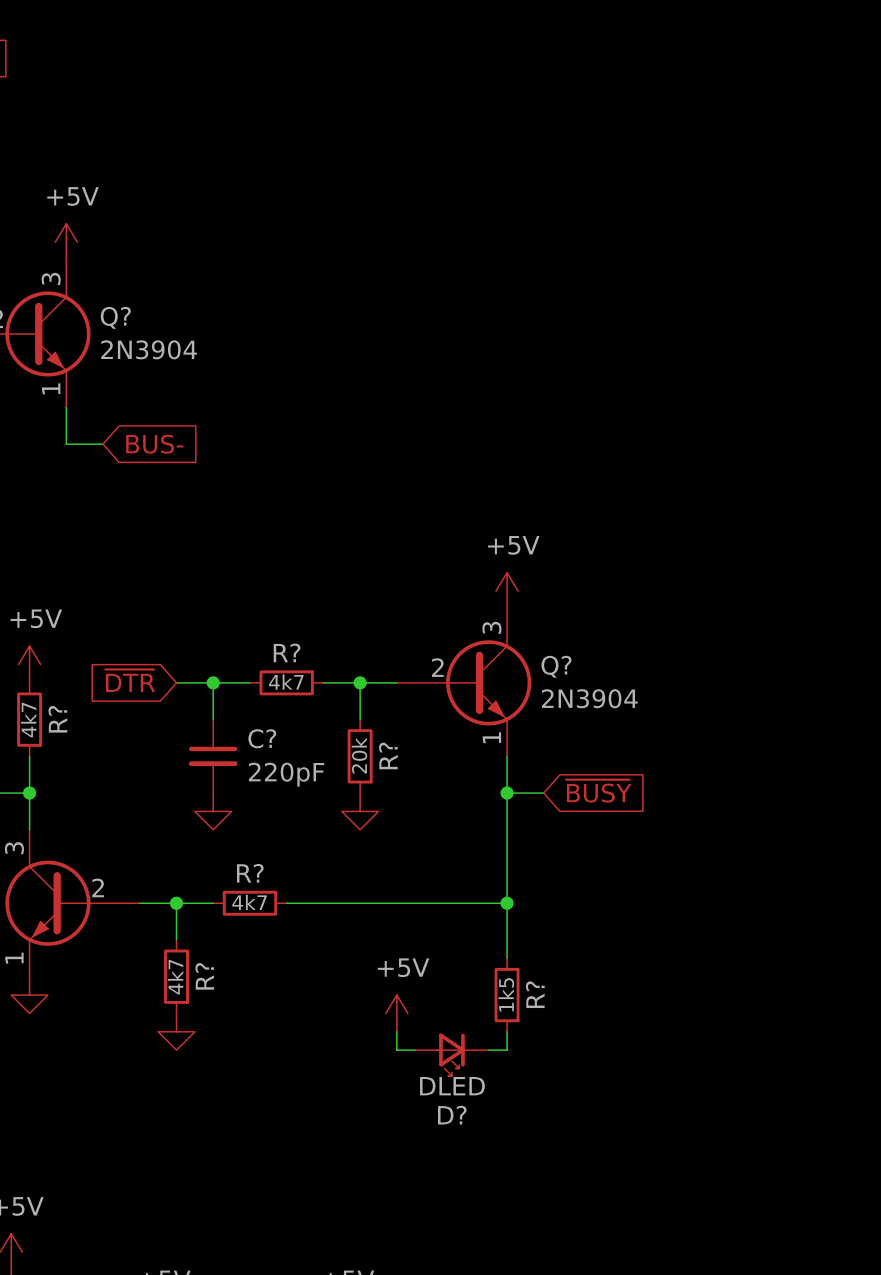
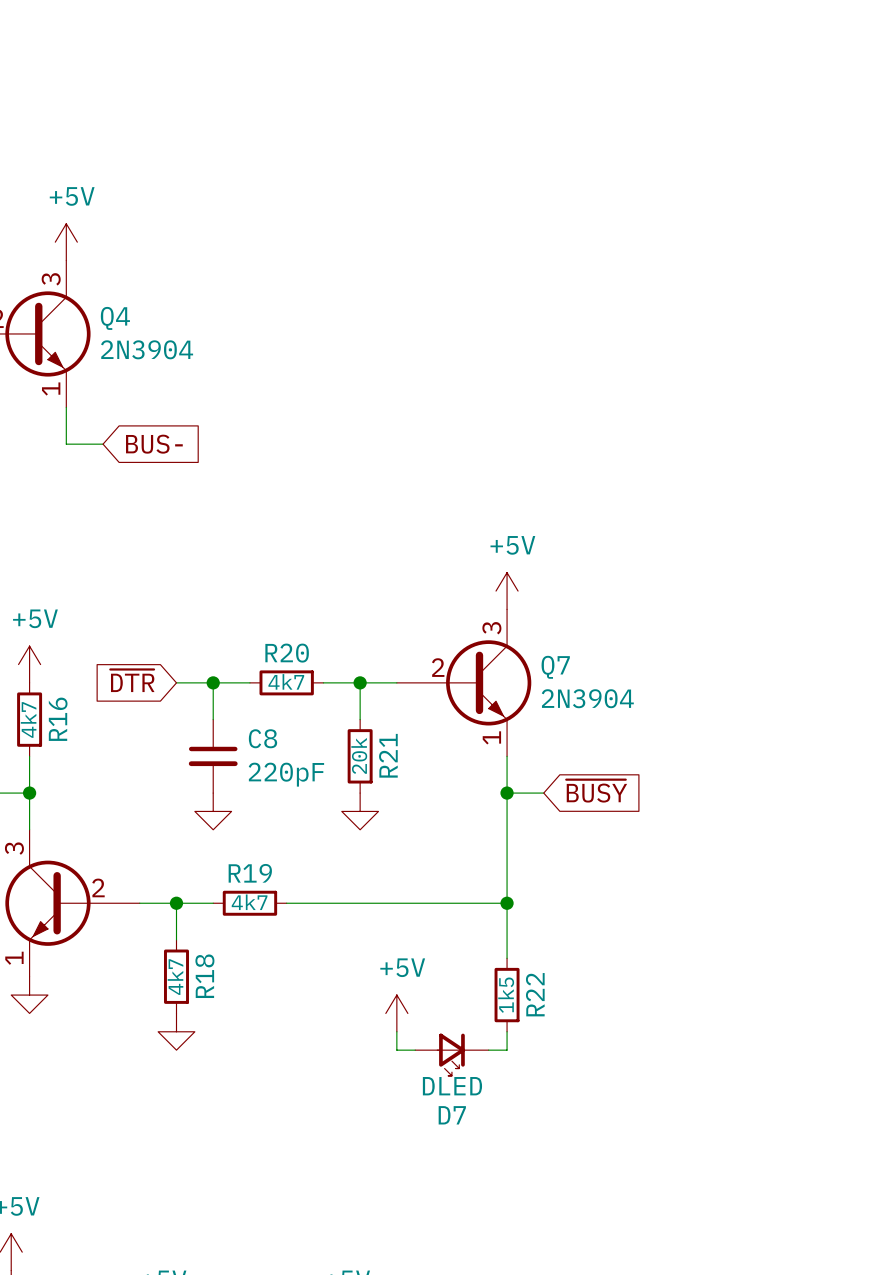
Q? name: Q? (115, 317) -> Q4 (115, 318)
R? name: R? (287, 652) -> R20 (287, 653)
Q? name: Q? (556, 666) -> Q7 (555, 667)
R? name: R? (57, 719) -> R16 (58, 719)
C? name: C? (262, 738) -> C8 (262, 738)
R? name: R? (388, 755) -> R21 (388, 755)
R? name: R? (250, 873) -> R19 (250, 873)
R? name: R? (204, 976) -> R18 (204, 976)
R? name: R? (535, 994) -> R22 (535, 994)
D? name: D? (452, 1115) -> D7 (452, 1115)

